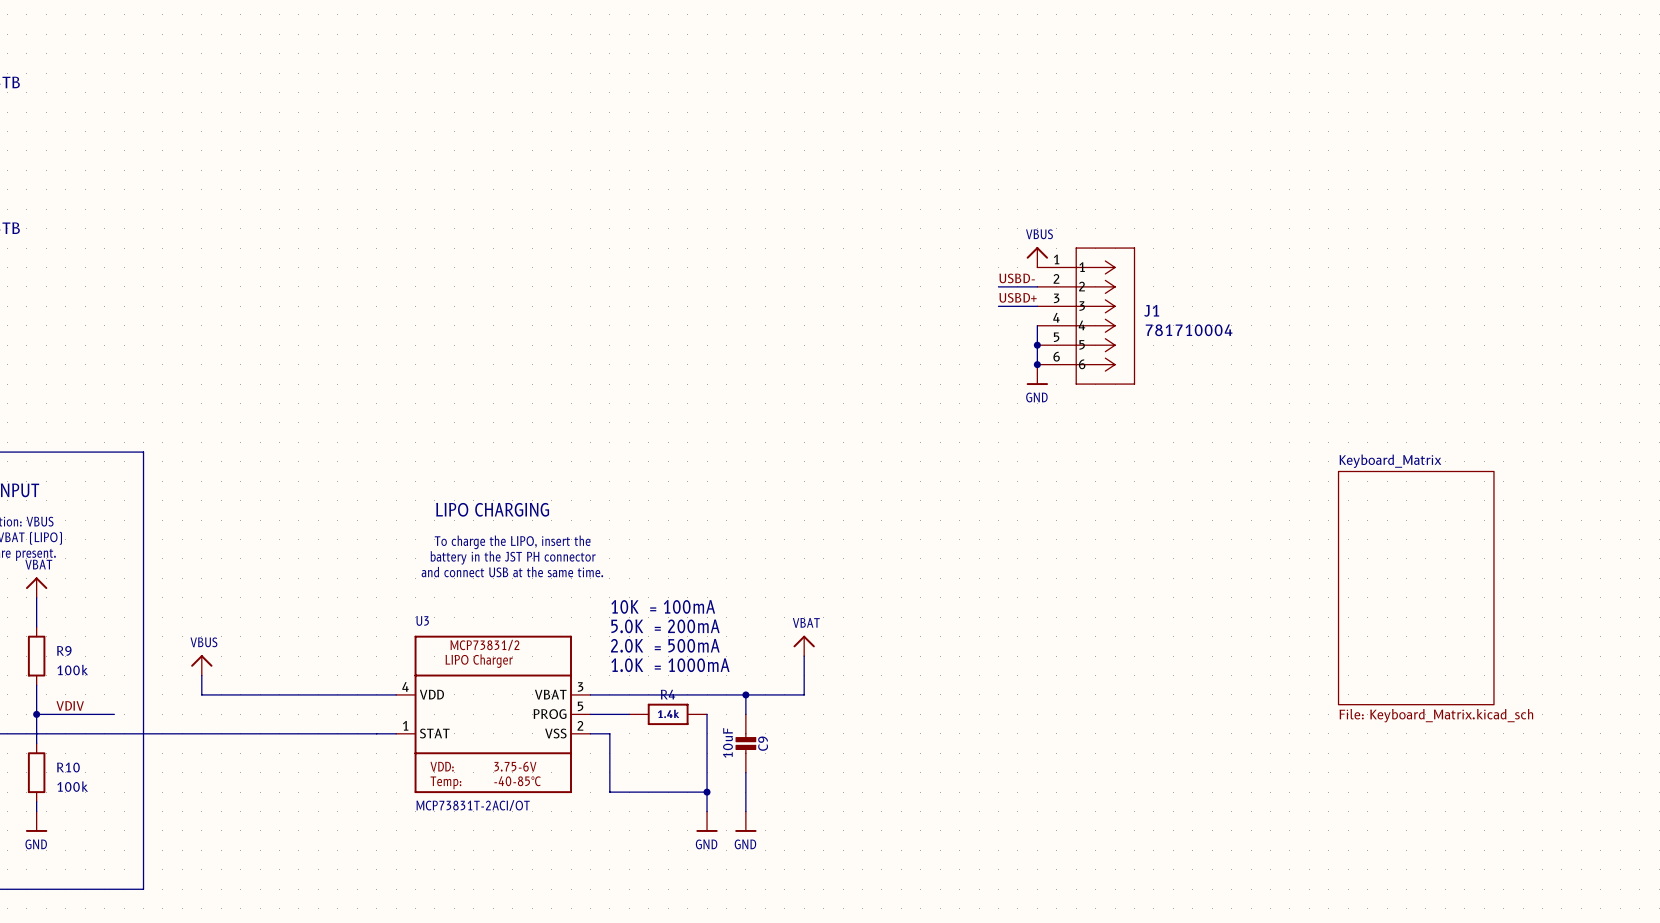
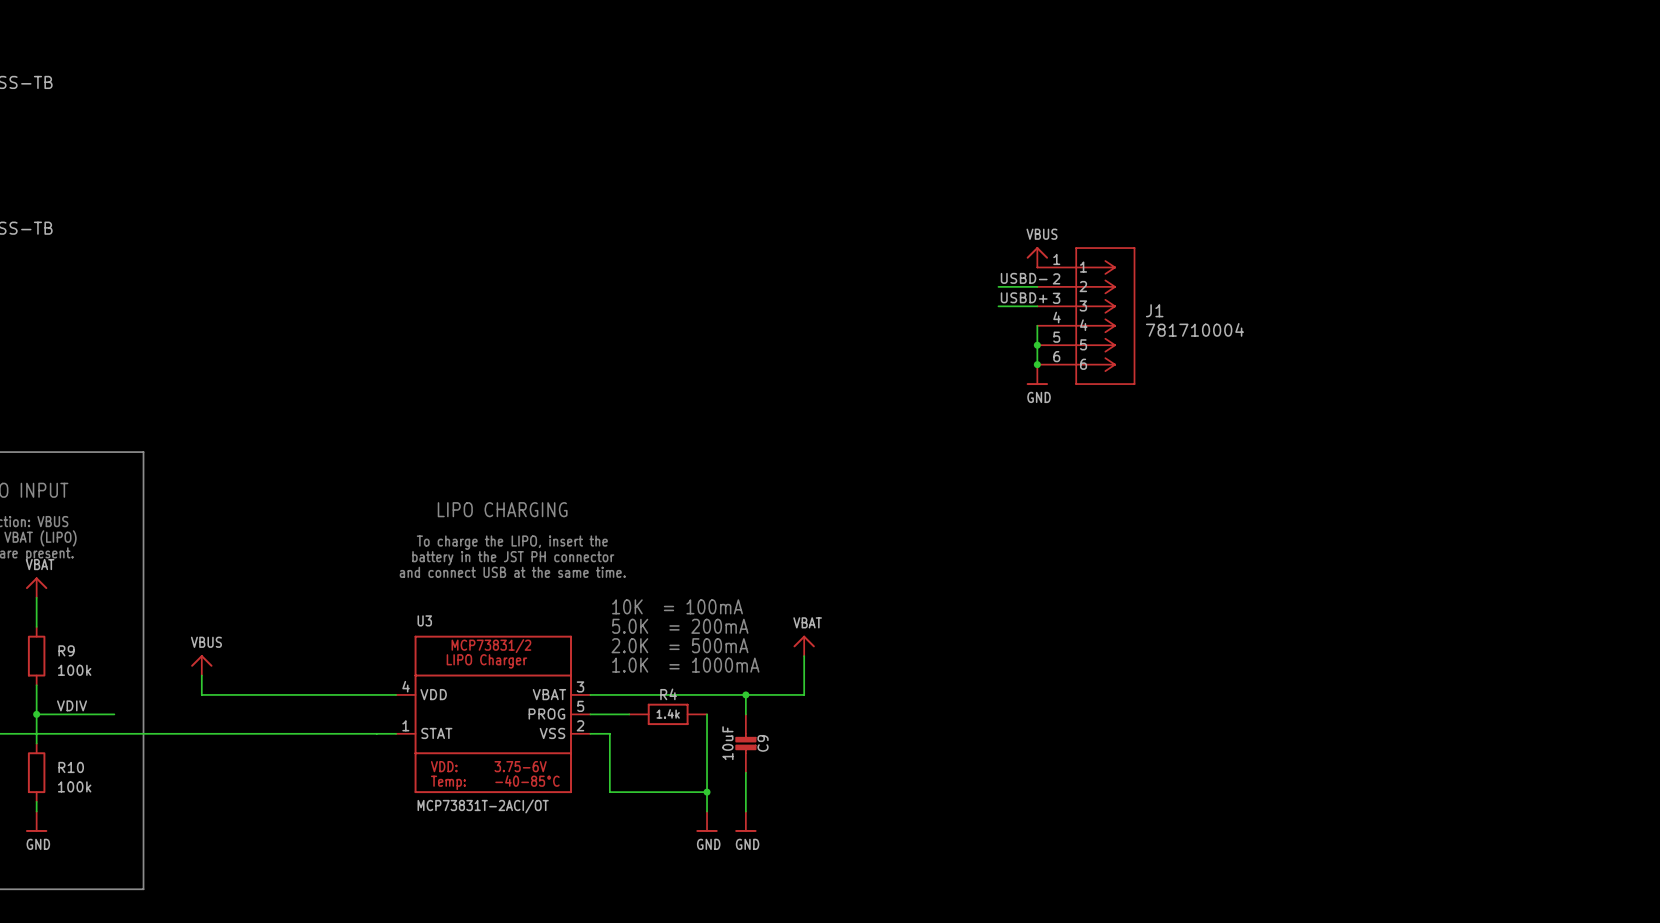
sheet Keyboard_Matrix: File: Keyboard_Matrix.kicad_sch (1416, 588) -> none

